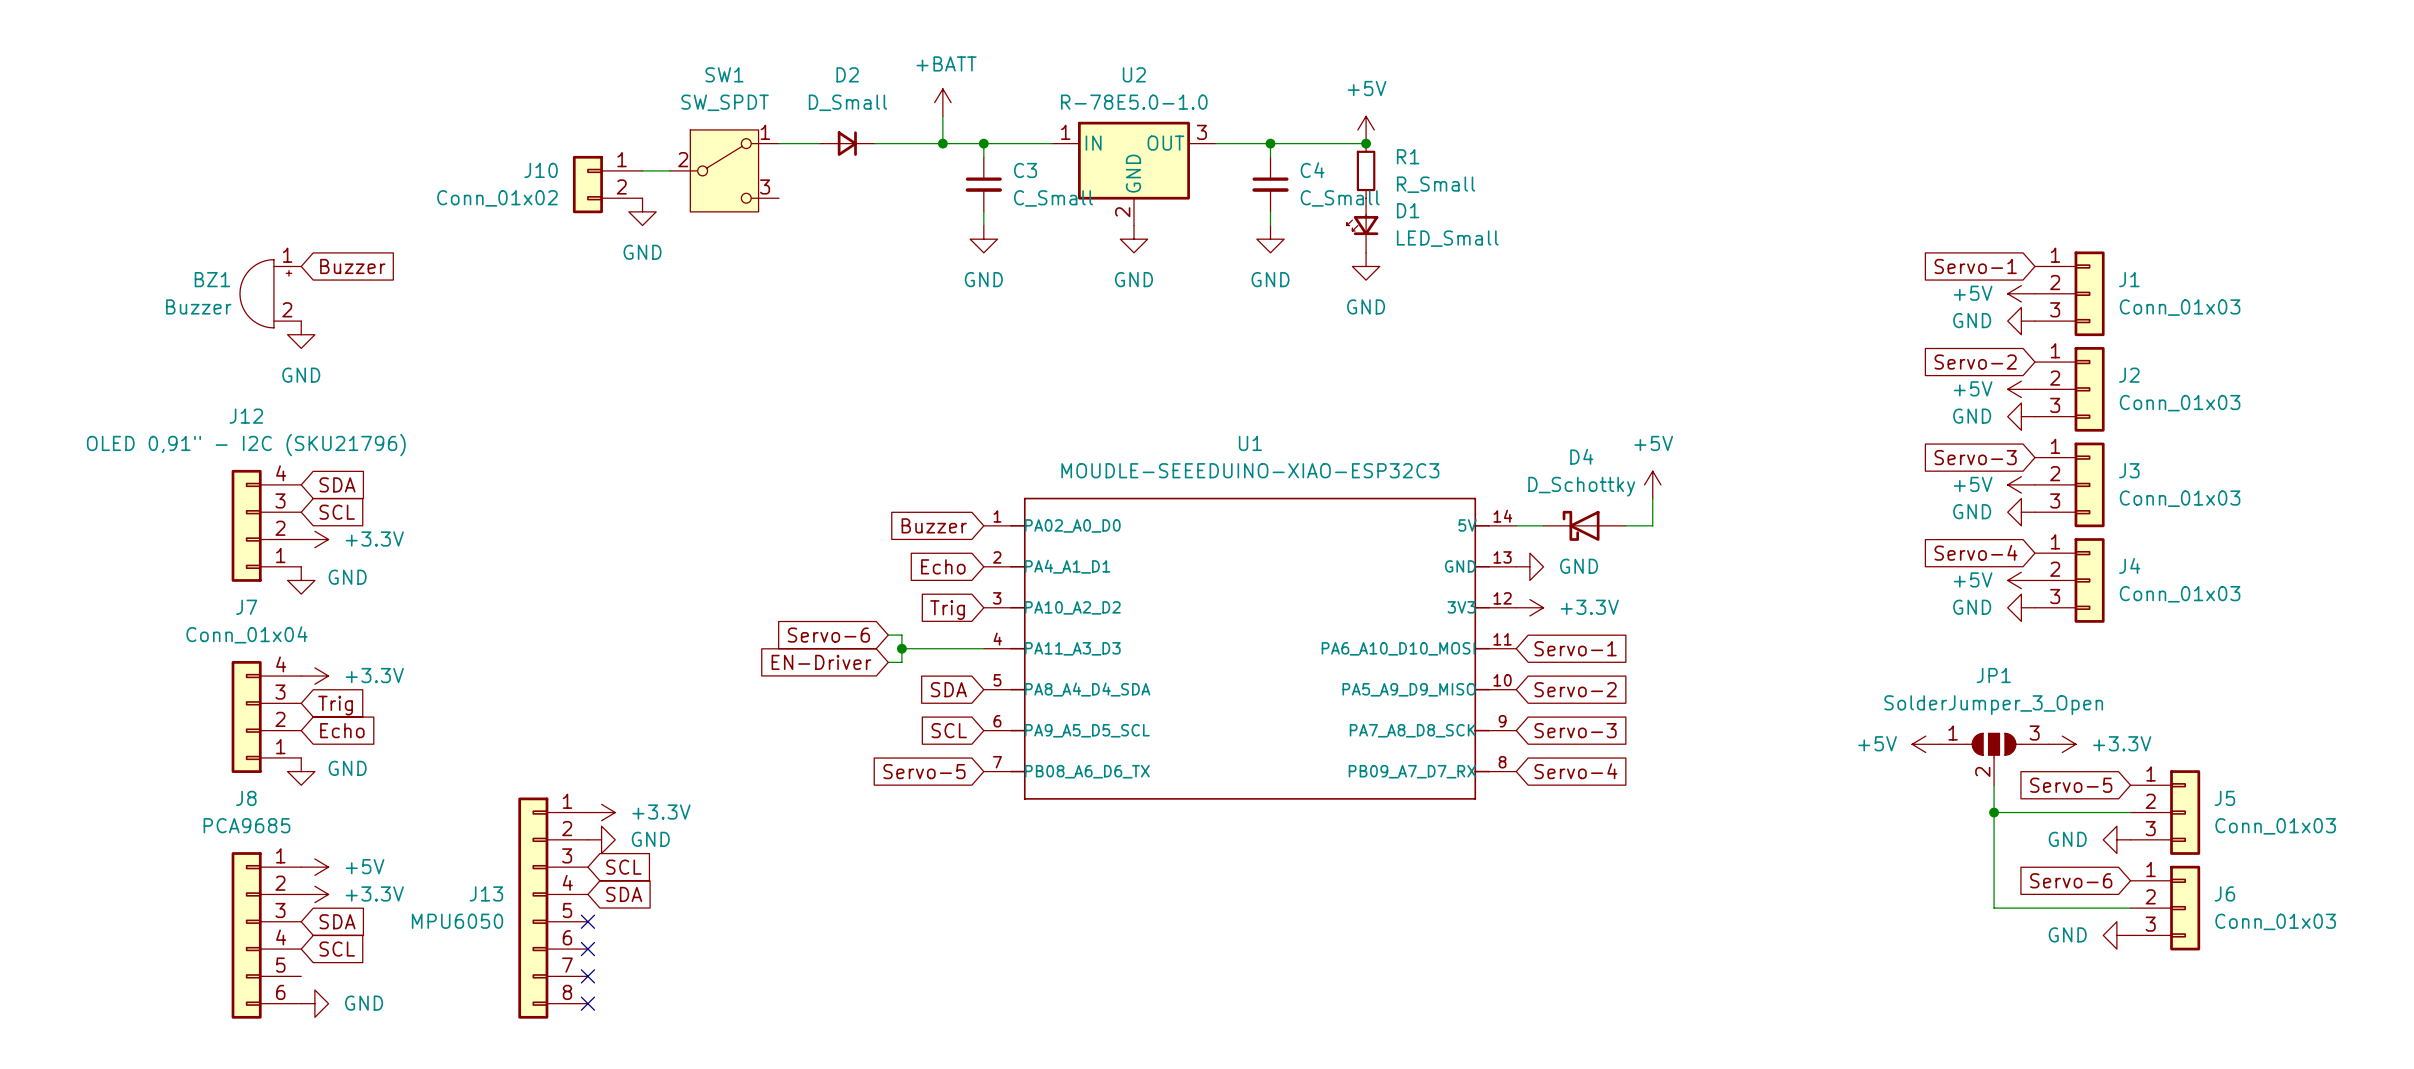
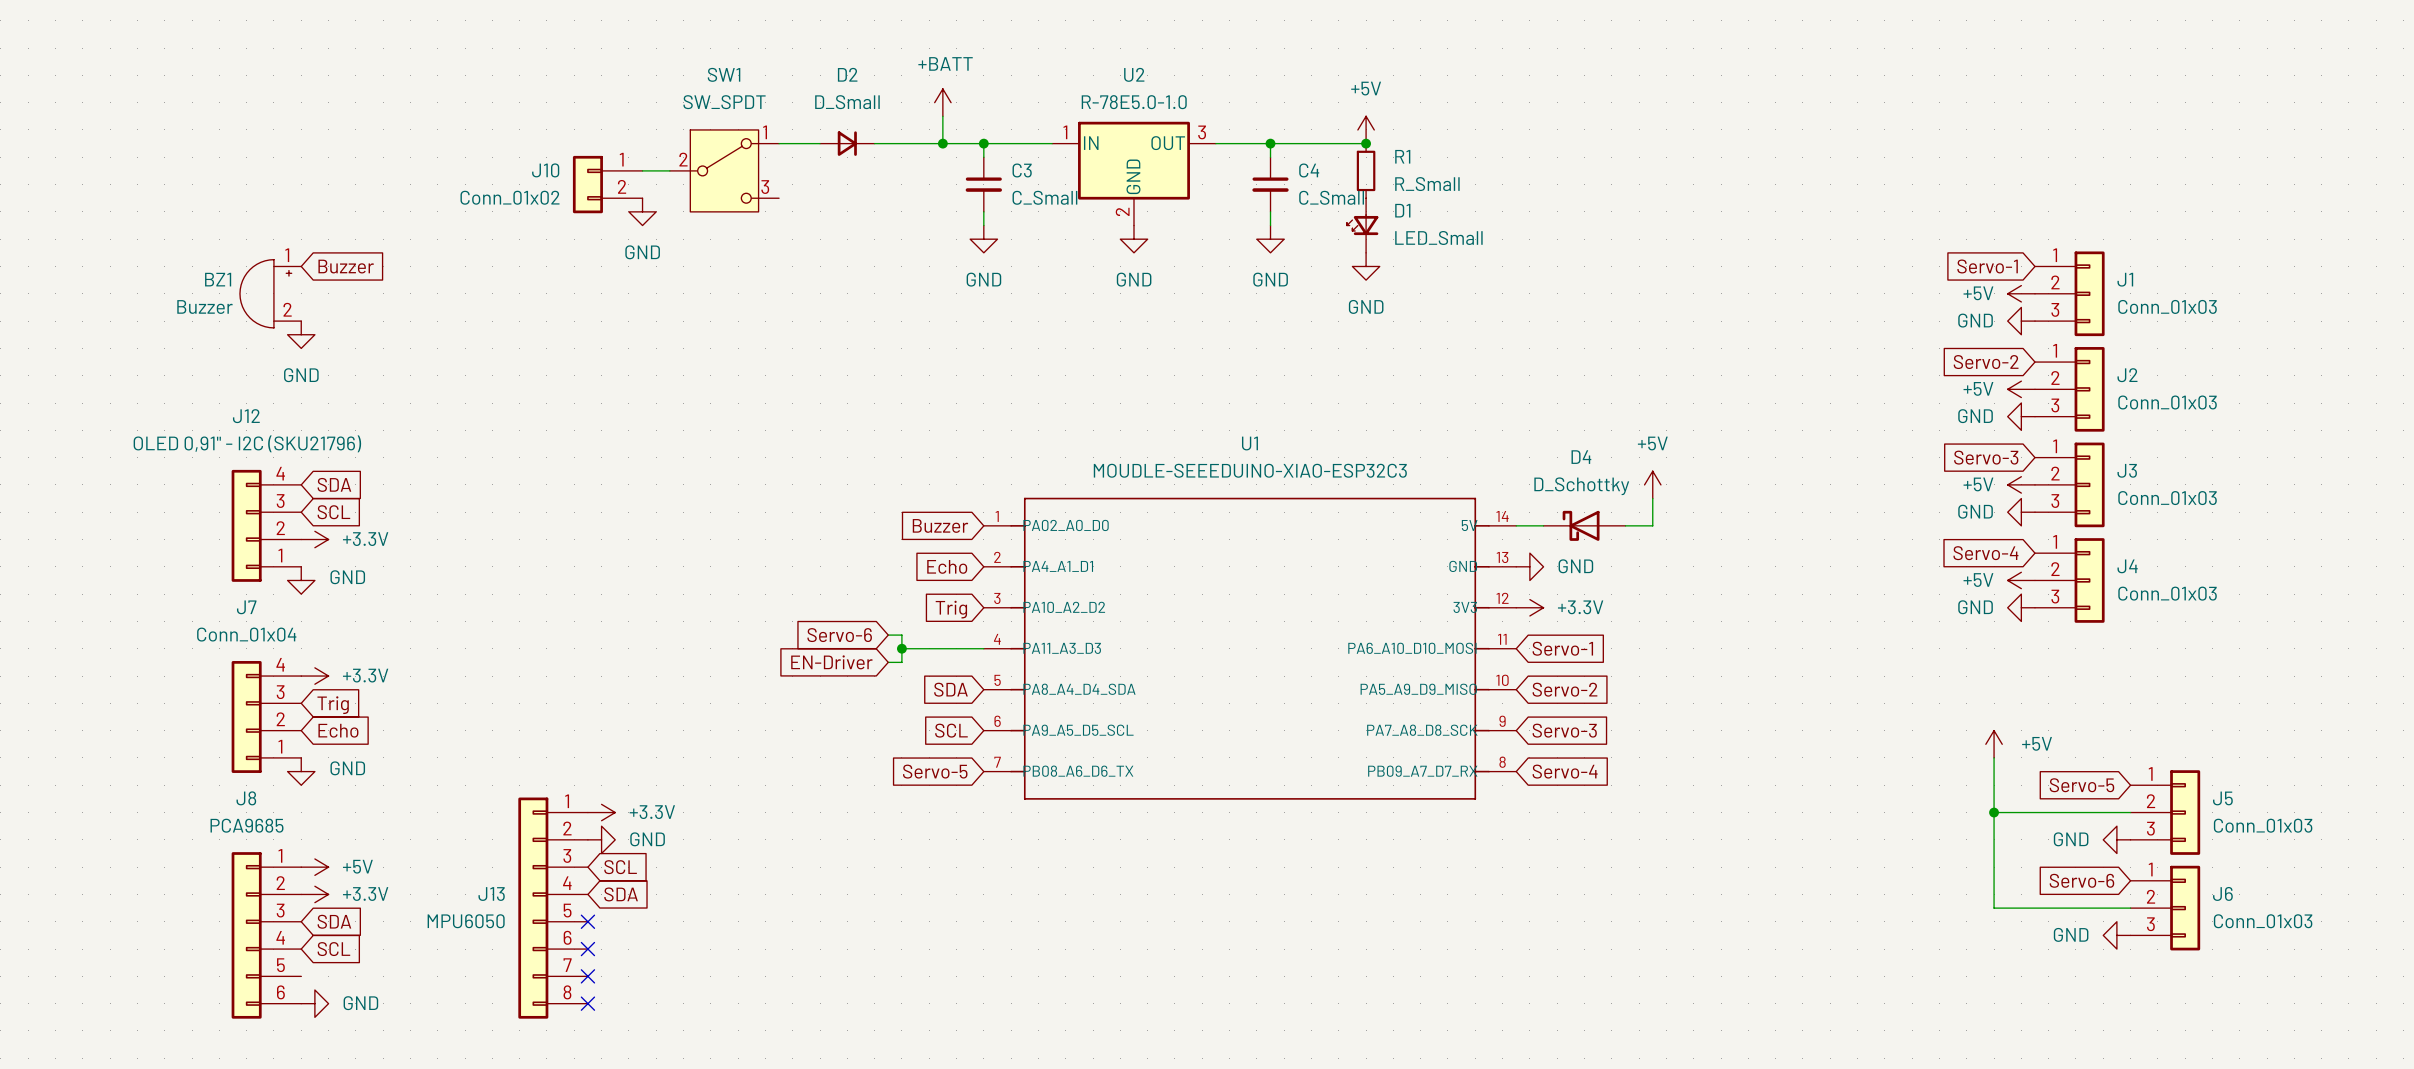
power symbol text position: +5V (1877, 743) -> +5V (2037, 743)
power symbol rotation: 0° (1925, 744) -> 90° clockwise (1994, 744)
power symbol position: +5V (1925, 744) -> +5V (1994, 744)
power symbol: +3.3V (2062, 744) -> none
JP1: SolderJumper_3_Open (1994, 759) -> none

